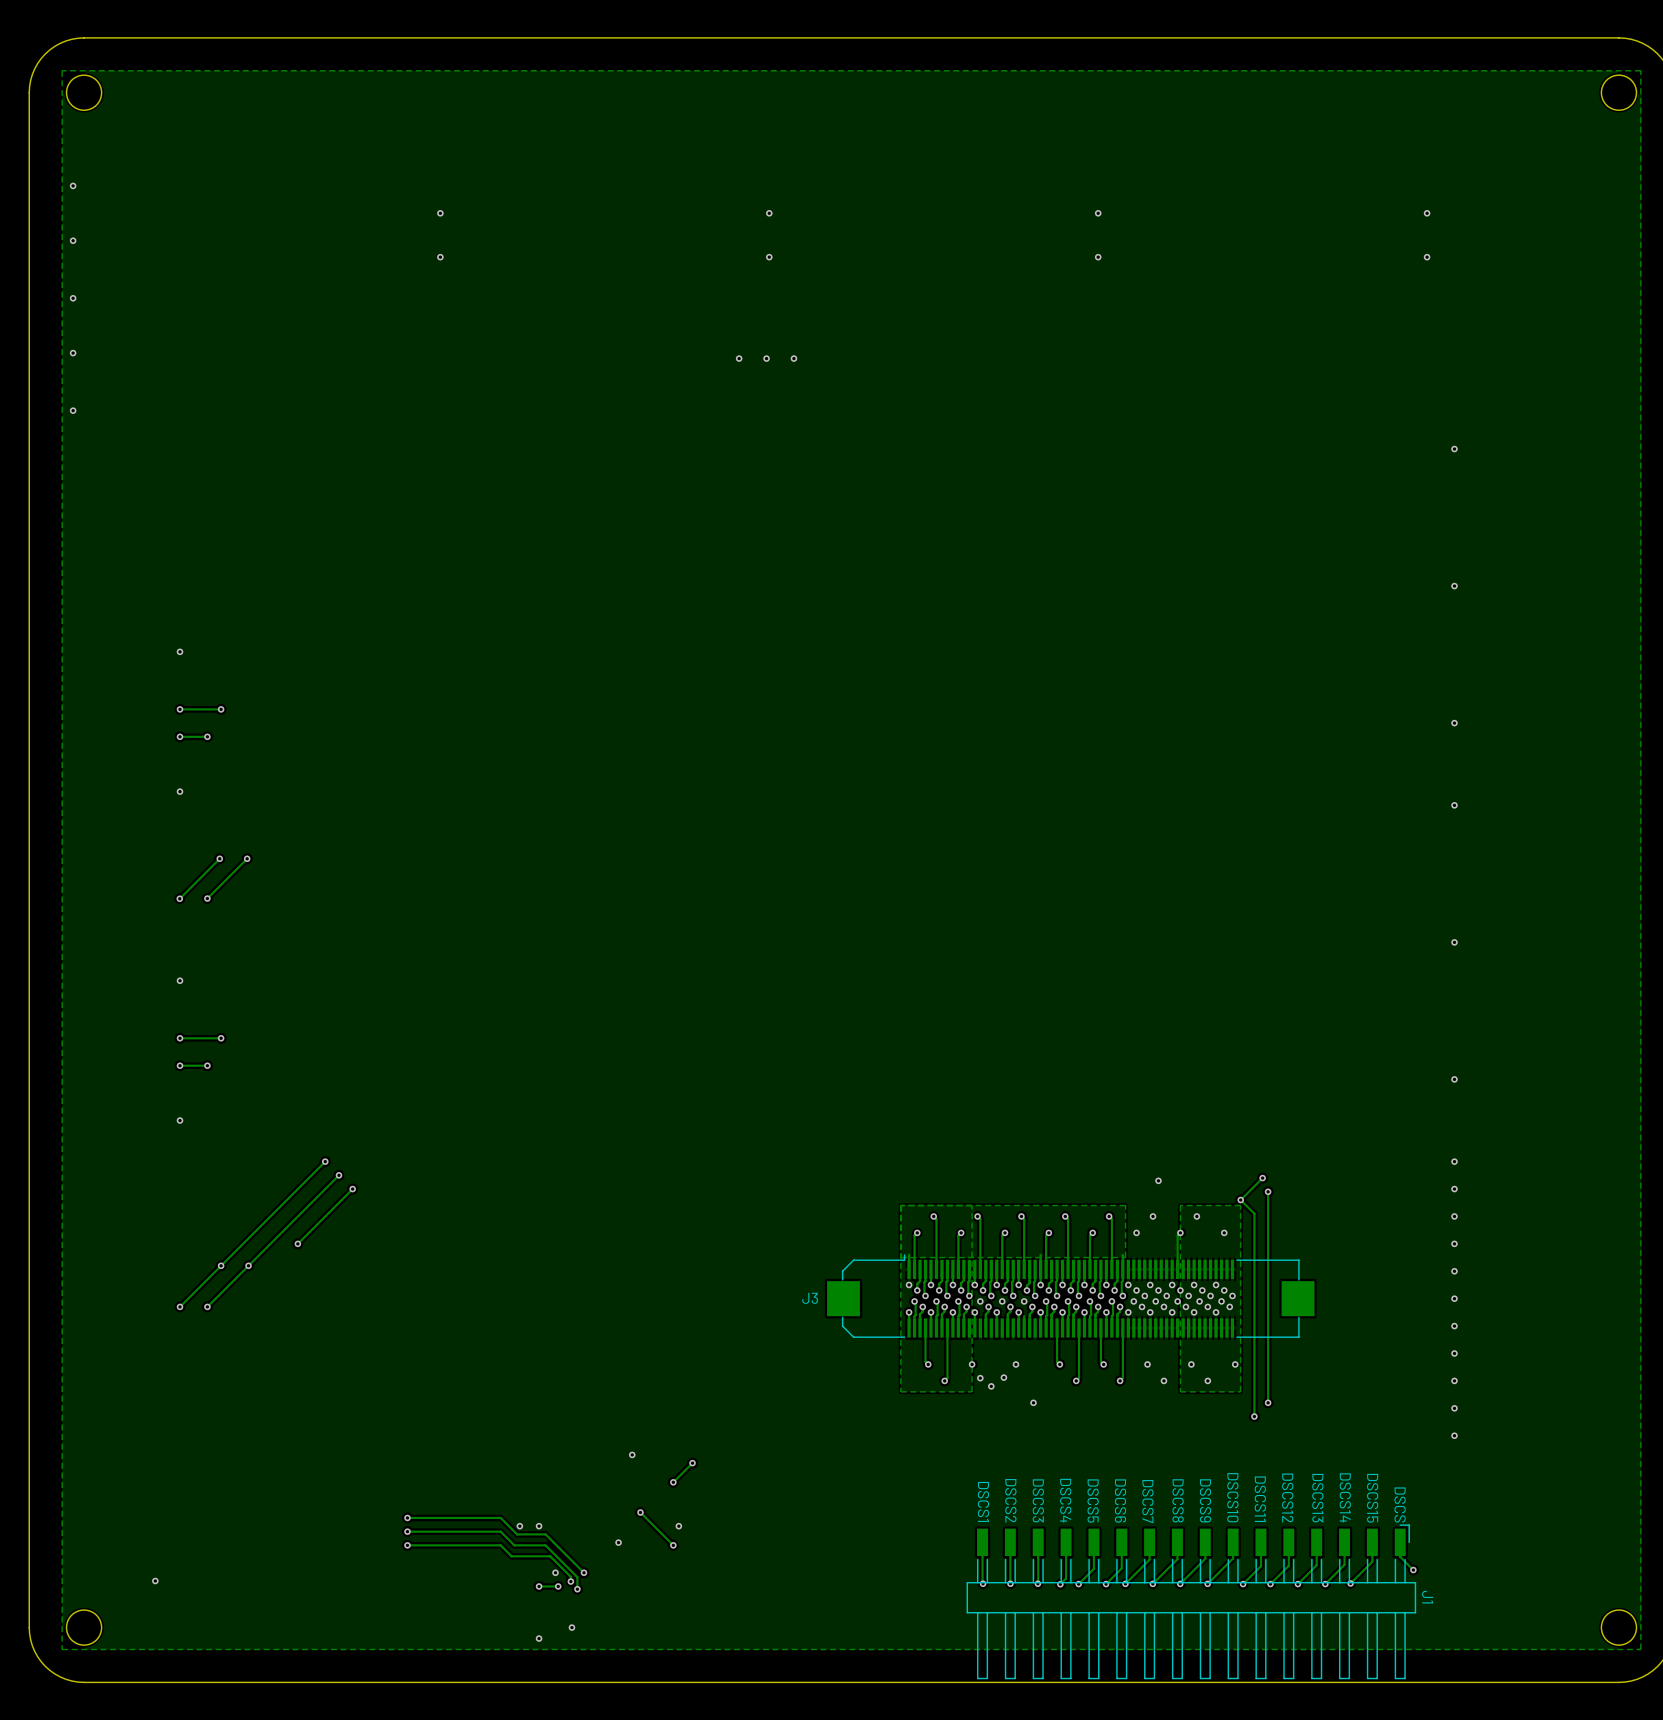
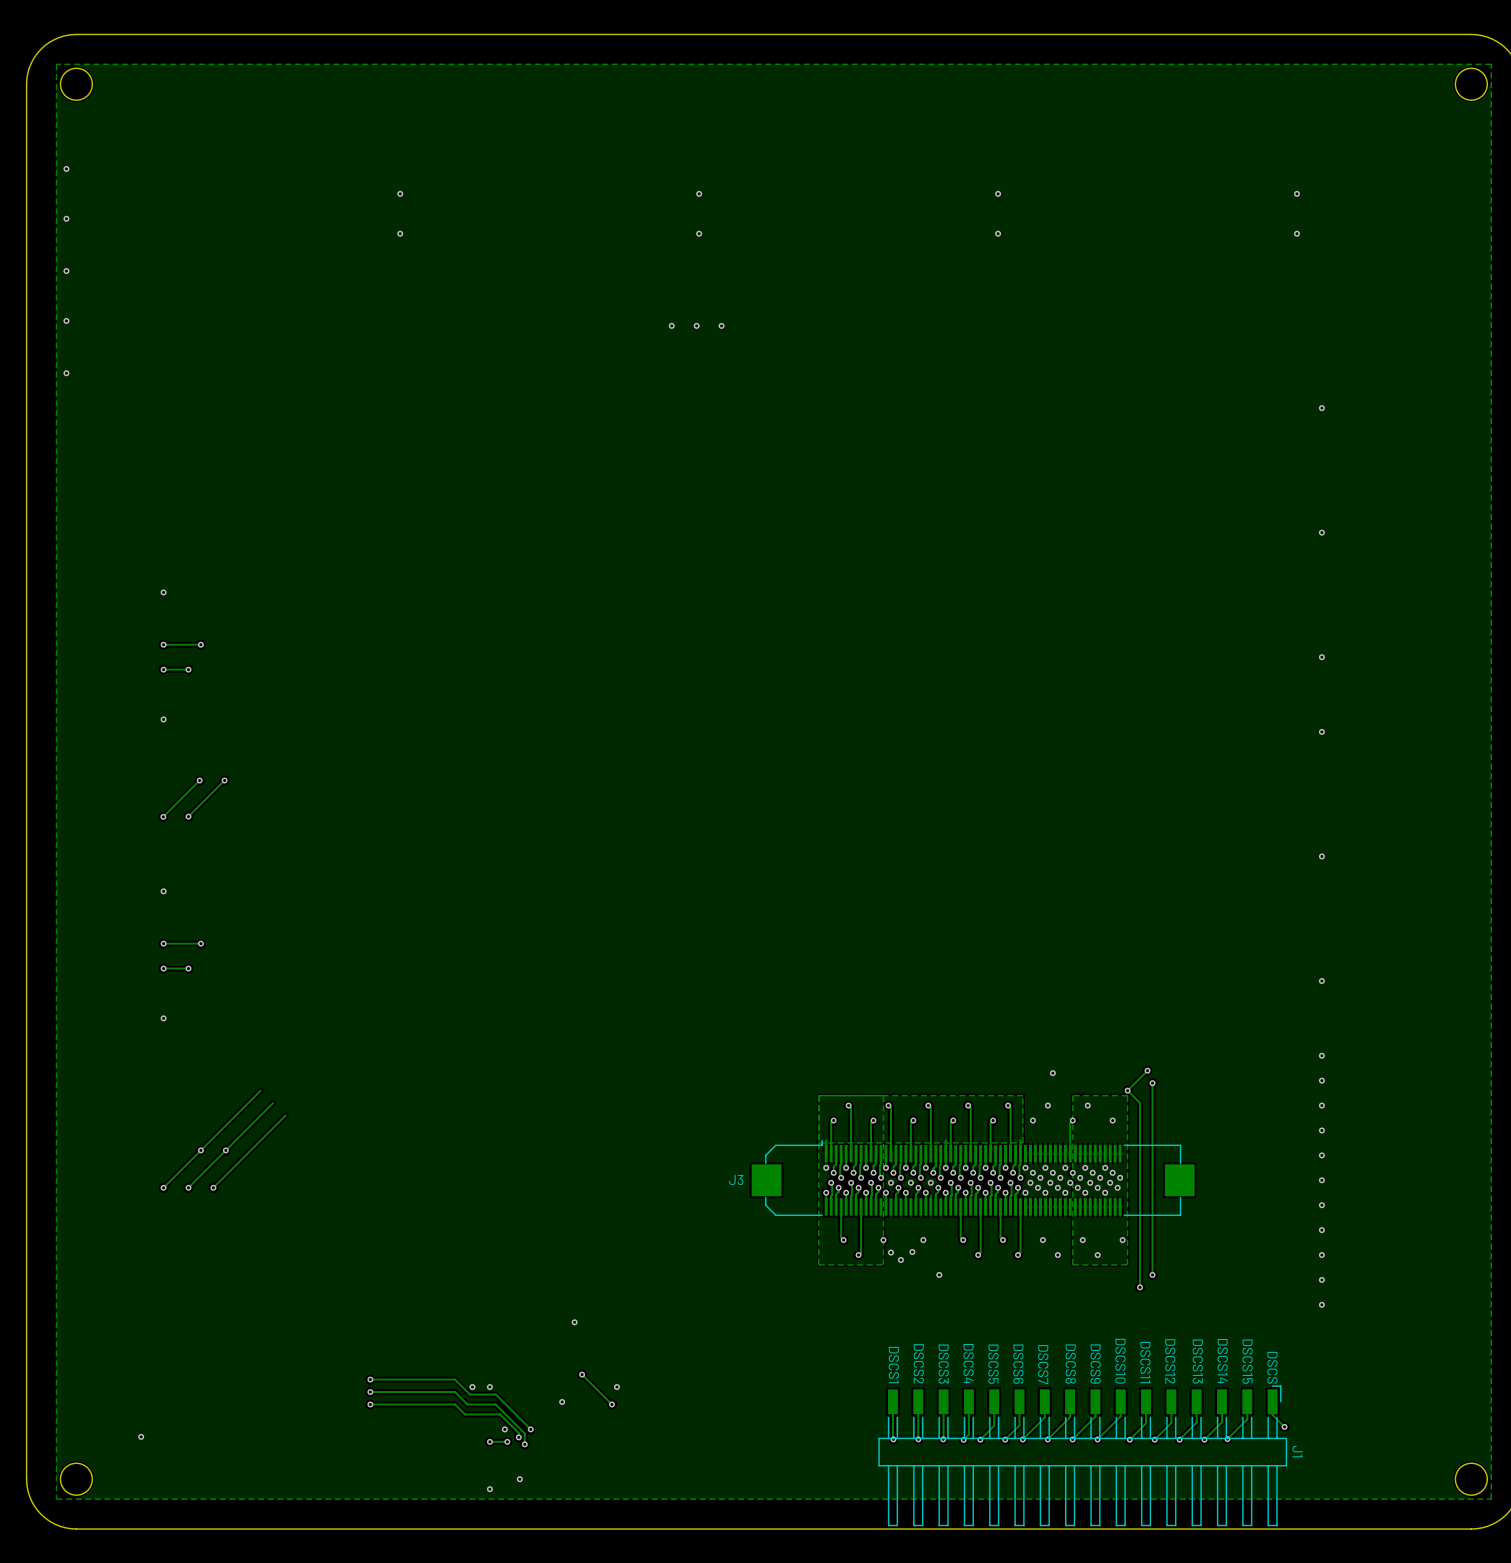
track: (325, 1161) (286, 1200) -> none
via: (325, 1161) -> none
track: (338, 1175) (300, 1213) -> none
via: (338, 1175) -> none
track: (352, 1189) (314, 1227) -> none
via: (352, 1189) -> none
track: none -> (270, 1130) (213, 1187)
via: (297, 1243) -> none
via: none -> (213, 1187)
track: (692, 1463) (673, 1482) -> none
via: (692, 1463) -> none
via: (673, 1482) -> none

